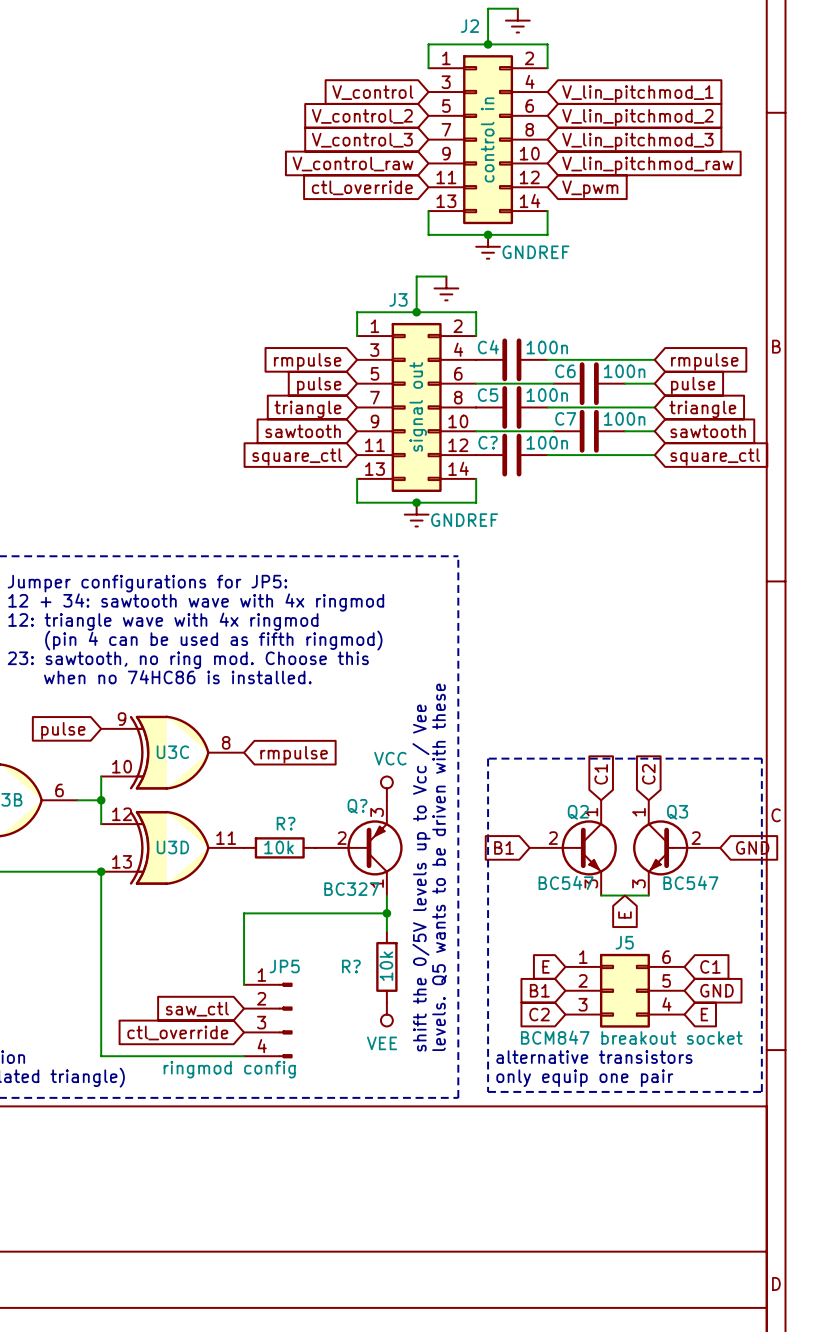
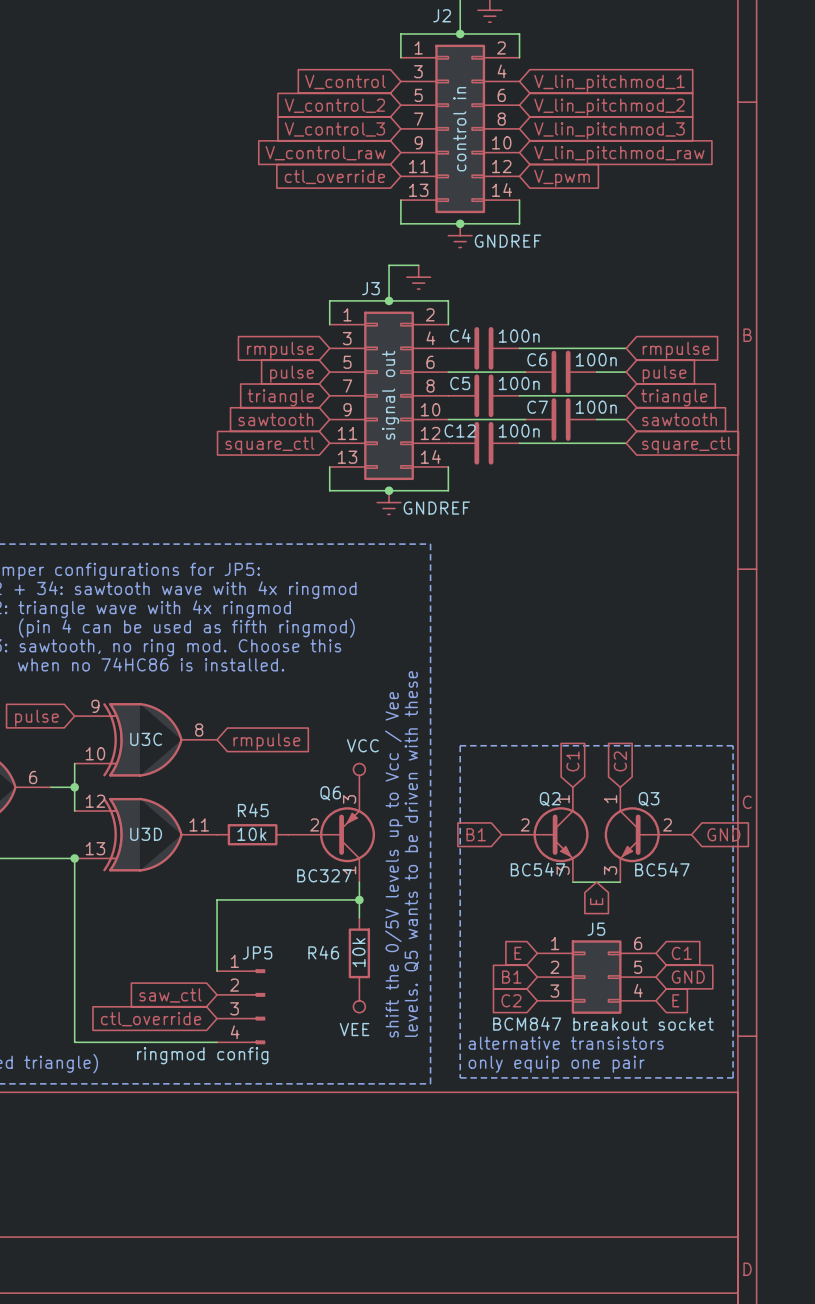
C? name: C? (488, 442) -> C12 (460, 430)
Q? name: Q? (357, 806) -> Q6 (330, 793)
R? name: R? (286, 823) -> R45 (253, 810)
R? name: R? (351, 966) -> R46 (323, 952)

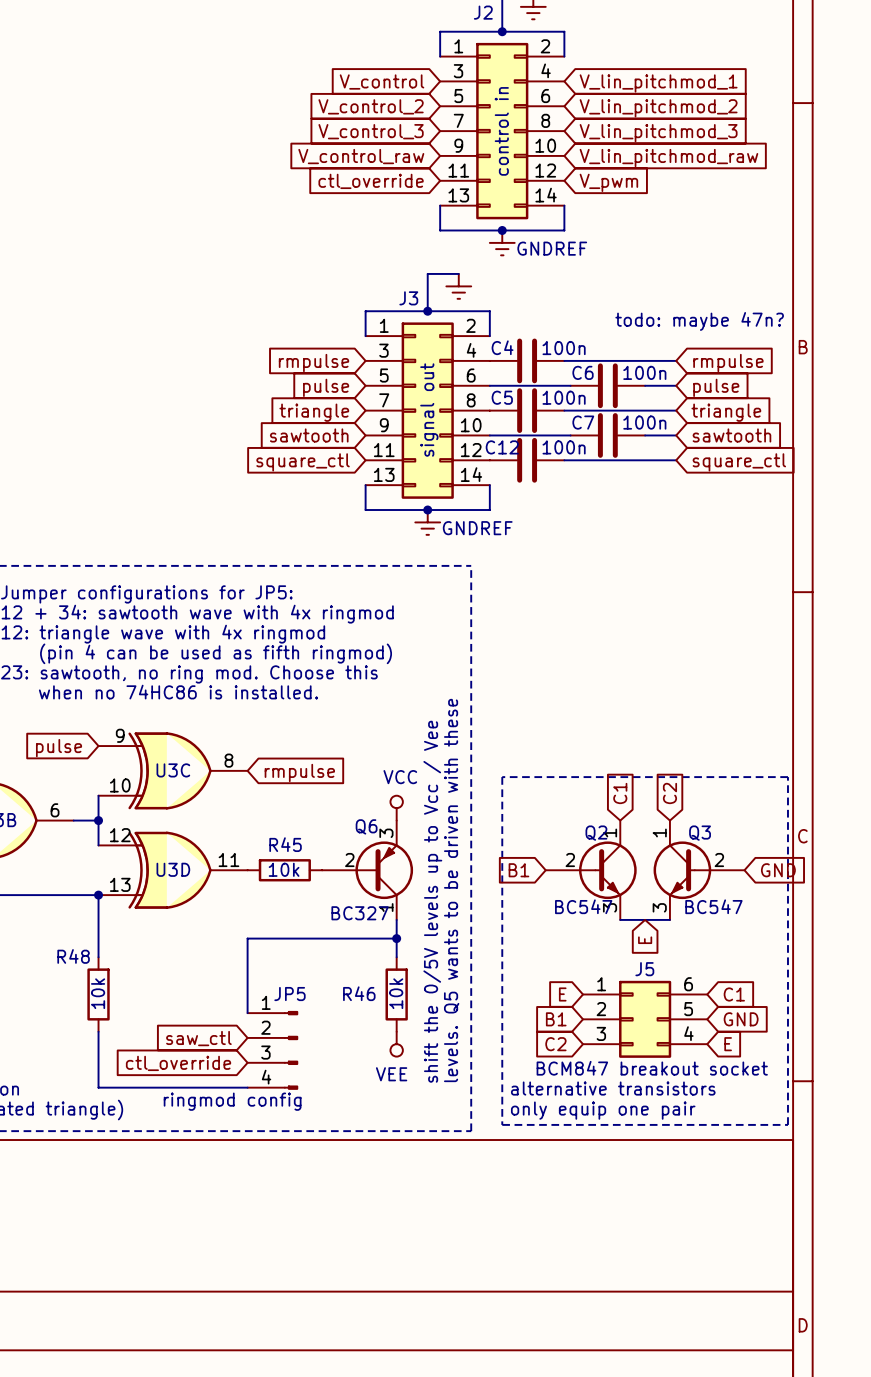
text: none -> todo: maybe 47n? (699, 321)
wire: (74, 917) (74, 988) -> none
R48: none -> 10k (98, 994)

